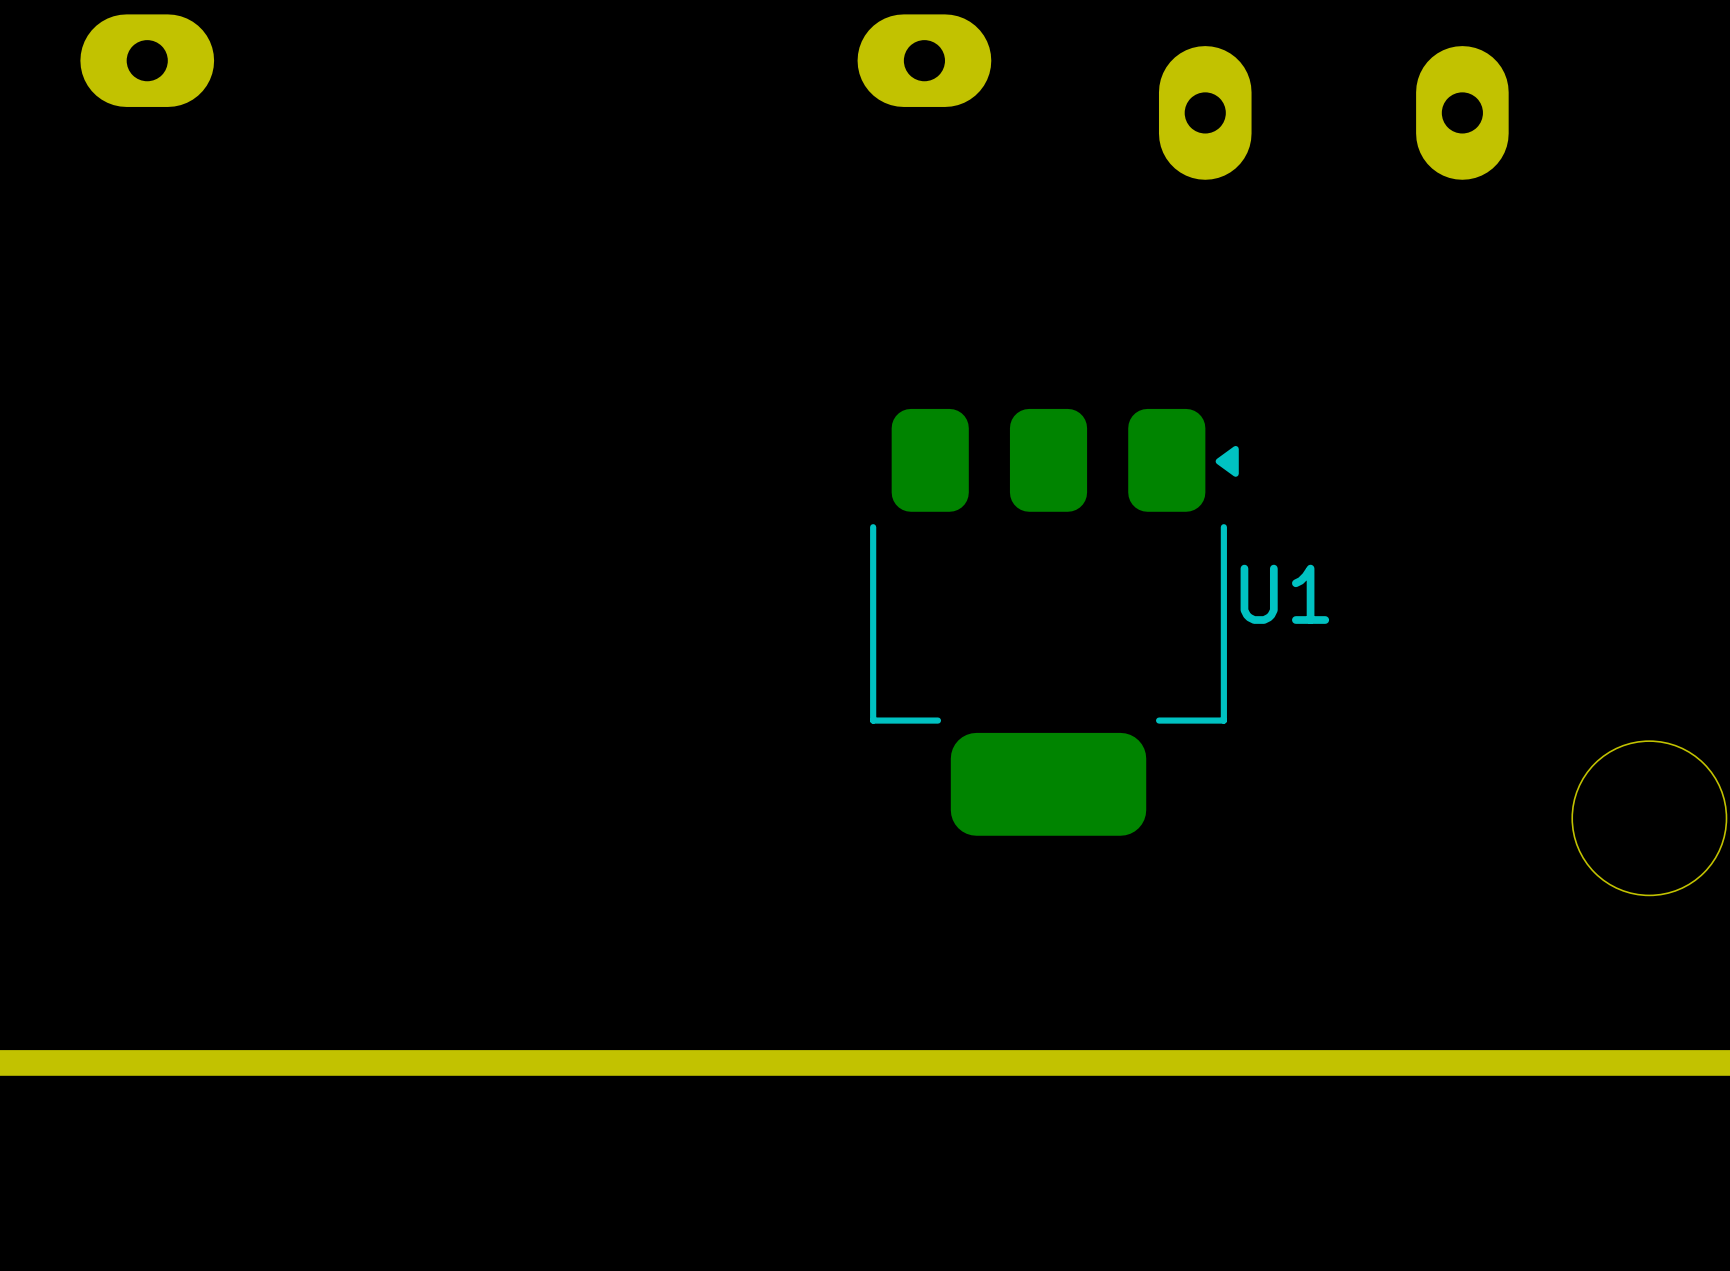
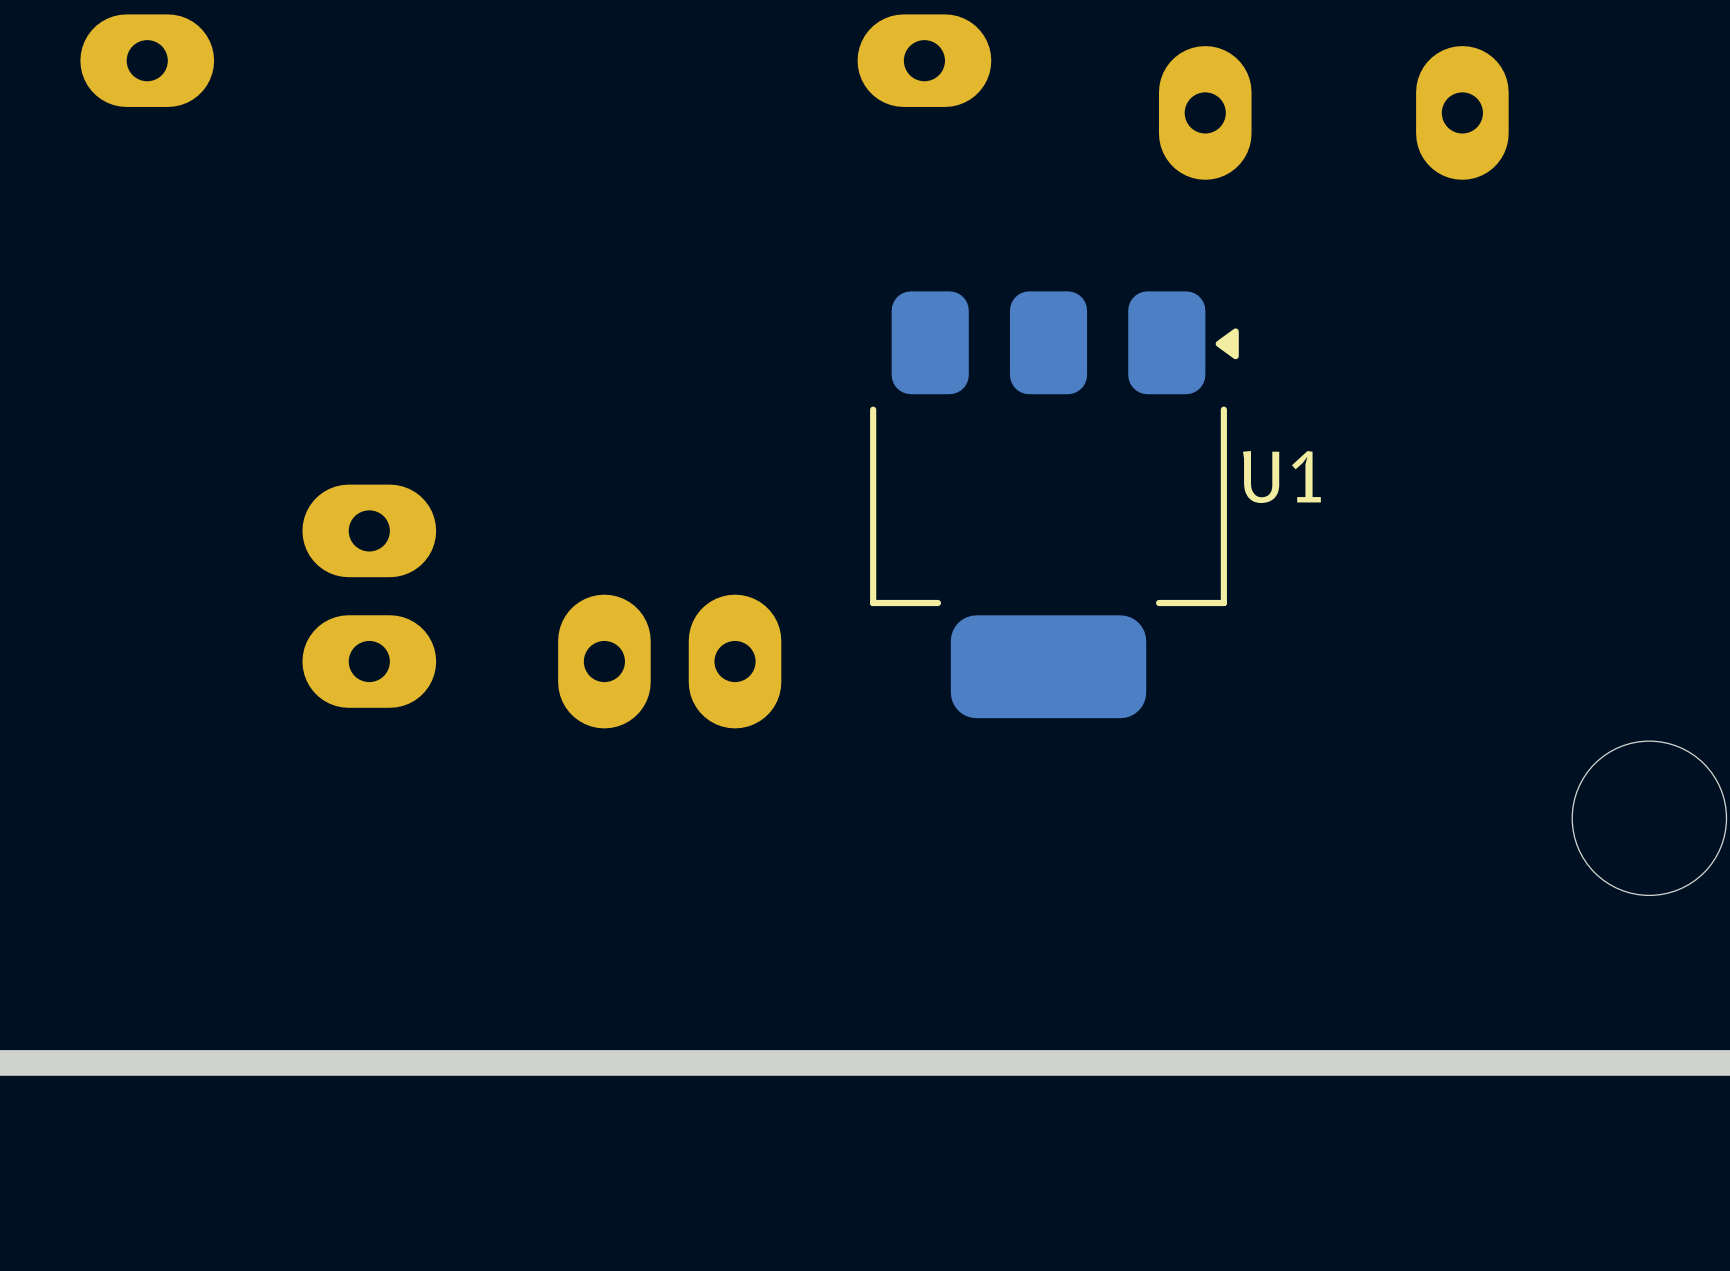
part: none -> (369, 596)
U1 position: (1054, 622) -> (1054, 504)
part: none -> (669, 661)

